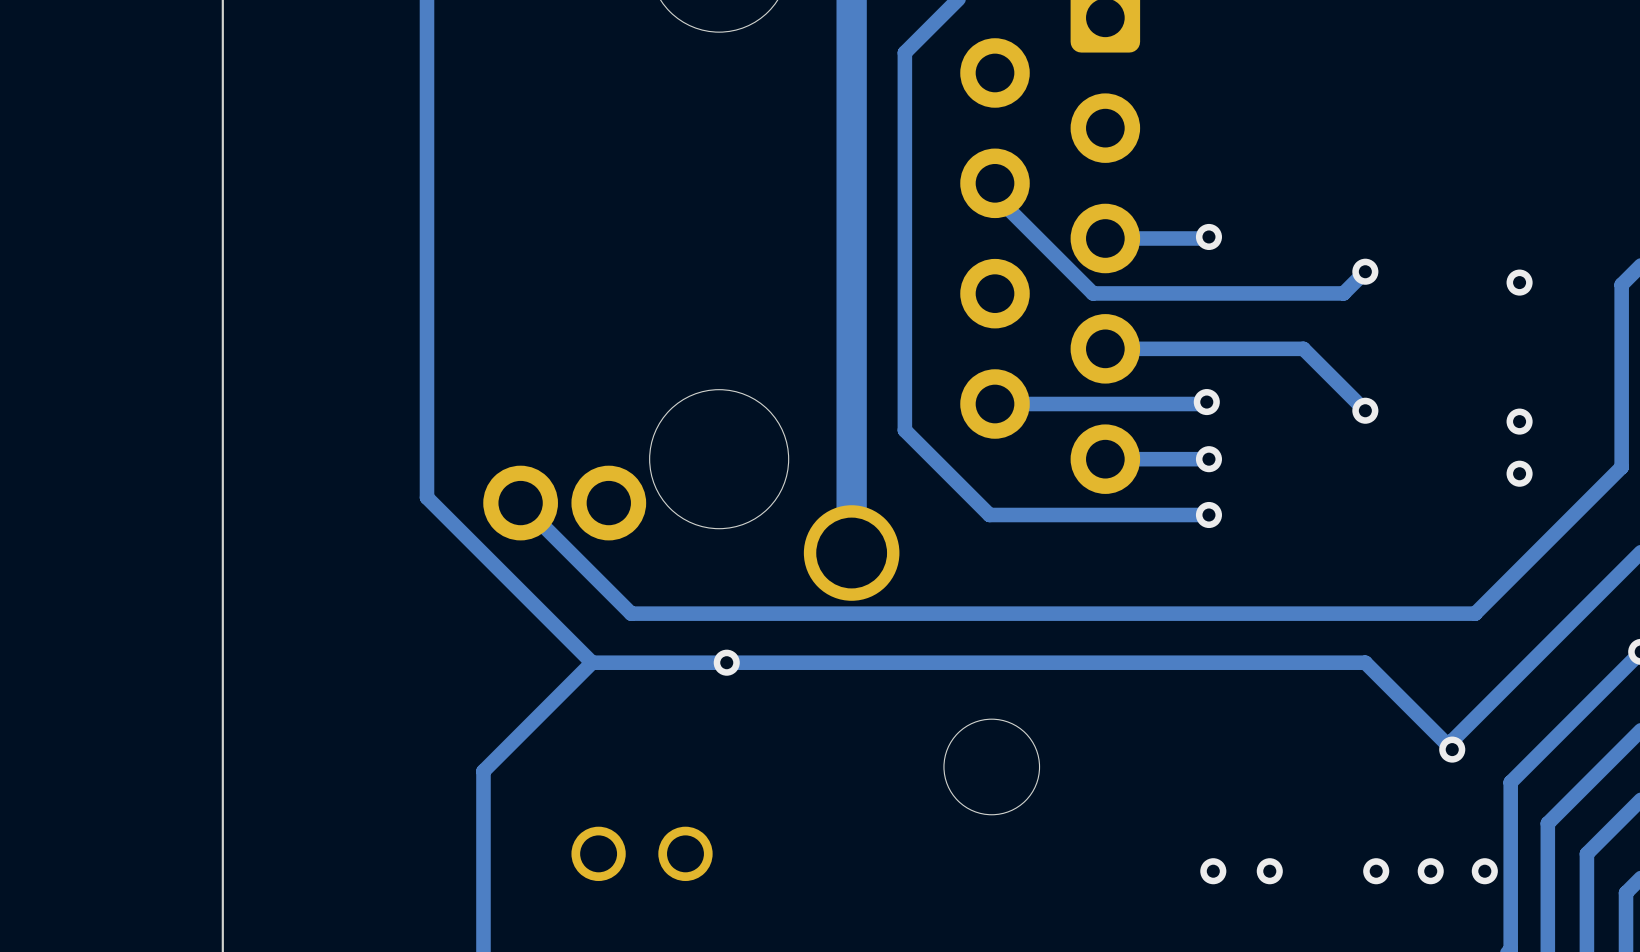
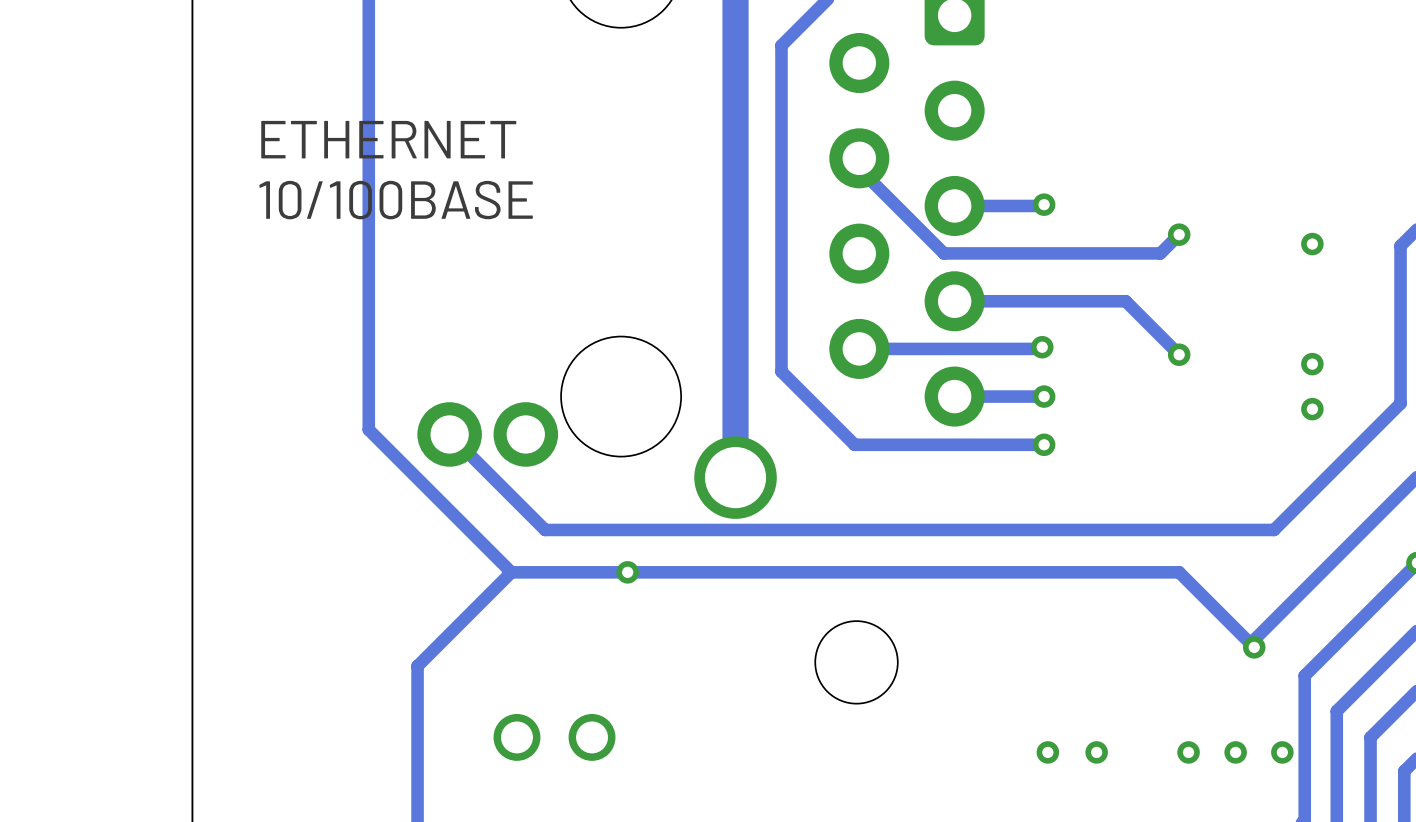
text: none -> ETHERNET (388, 139)
text: none -> 10/100BASE (396, 200)

